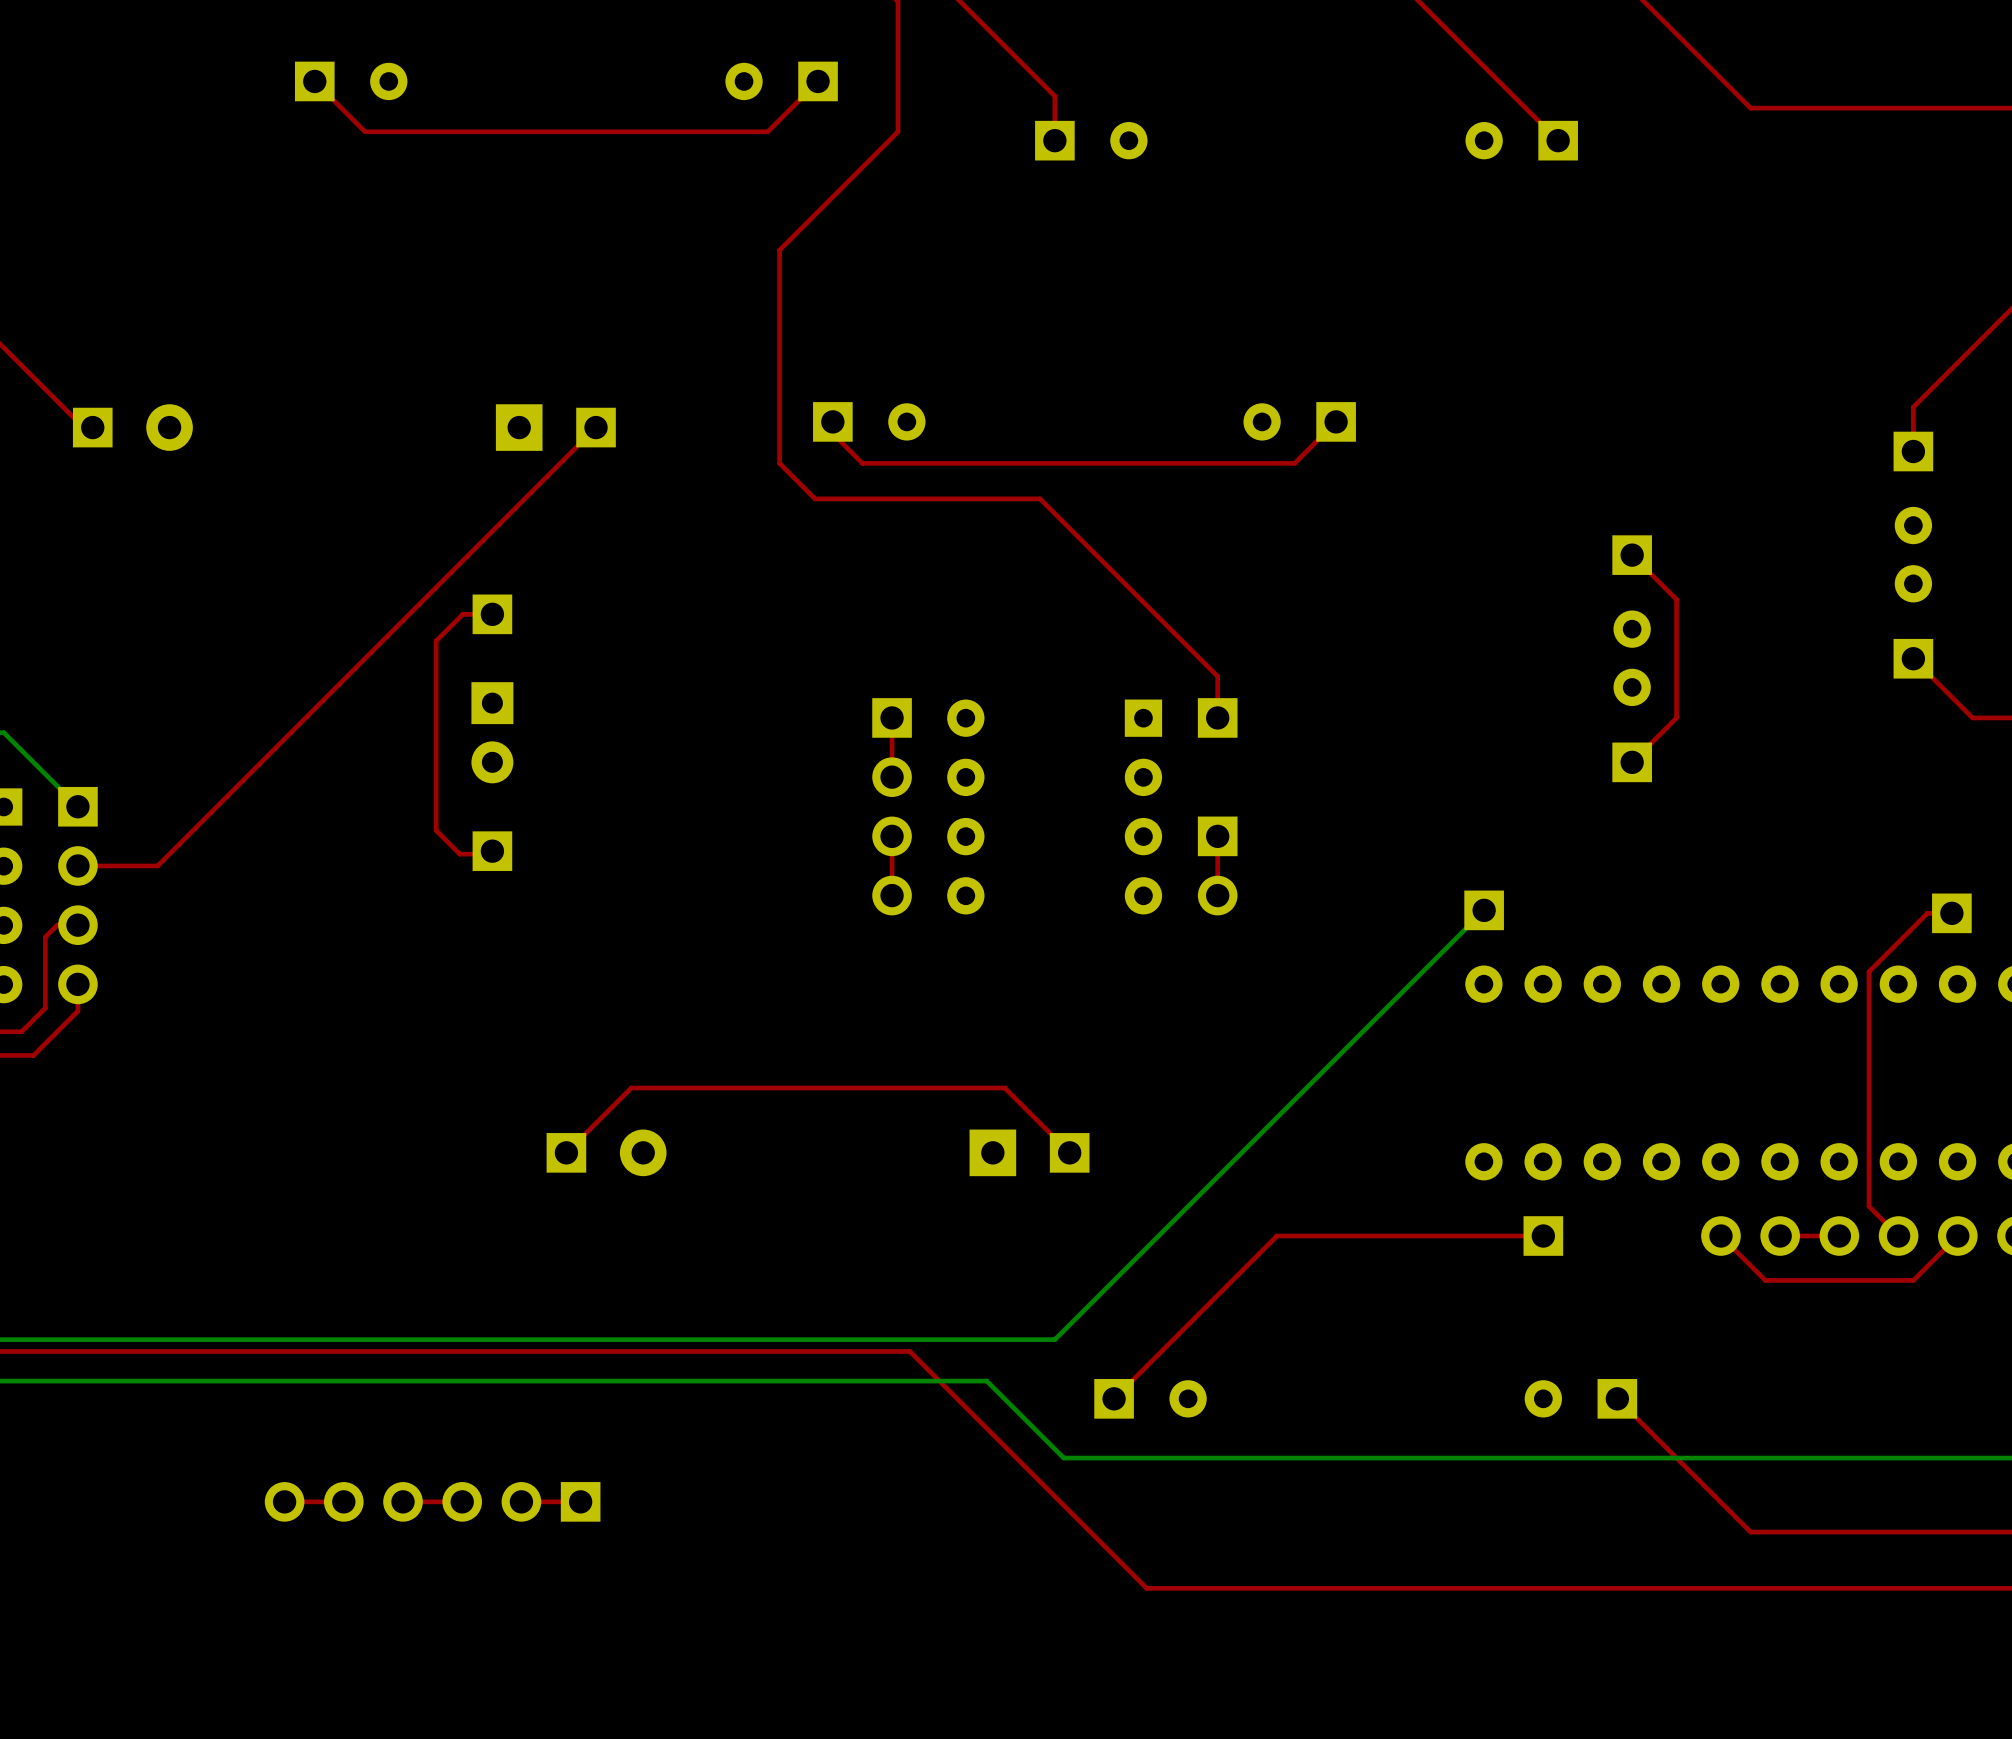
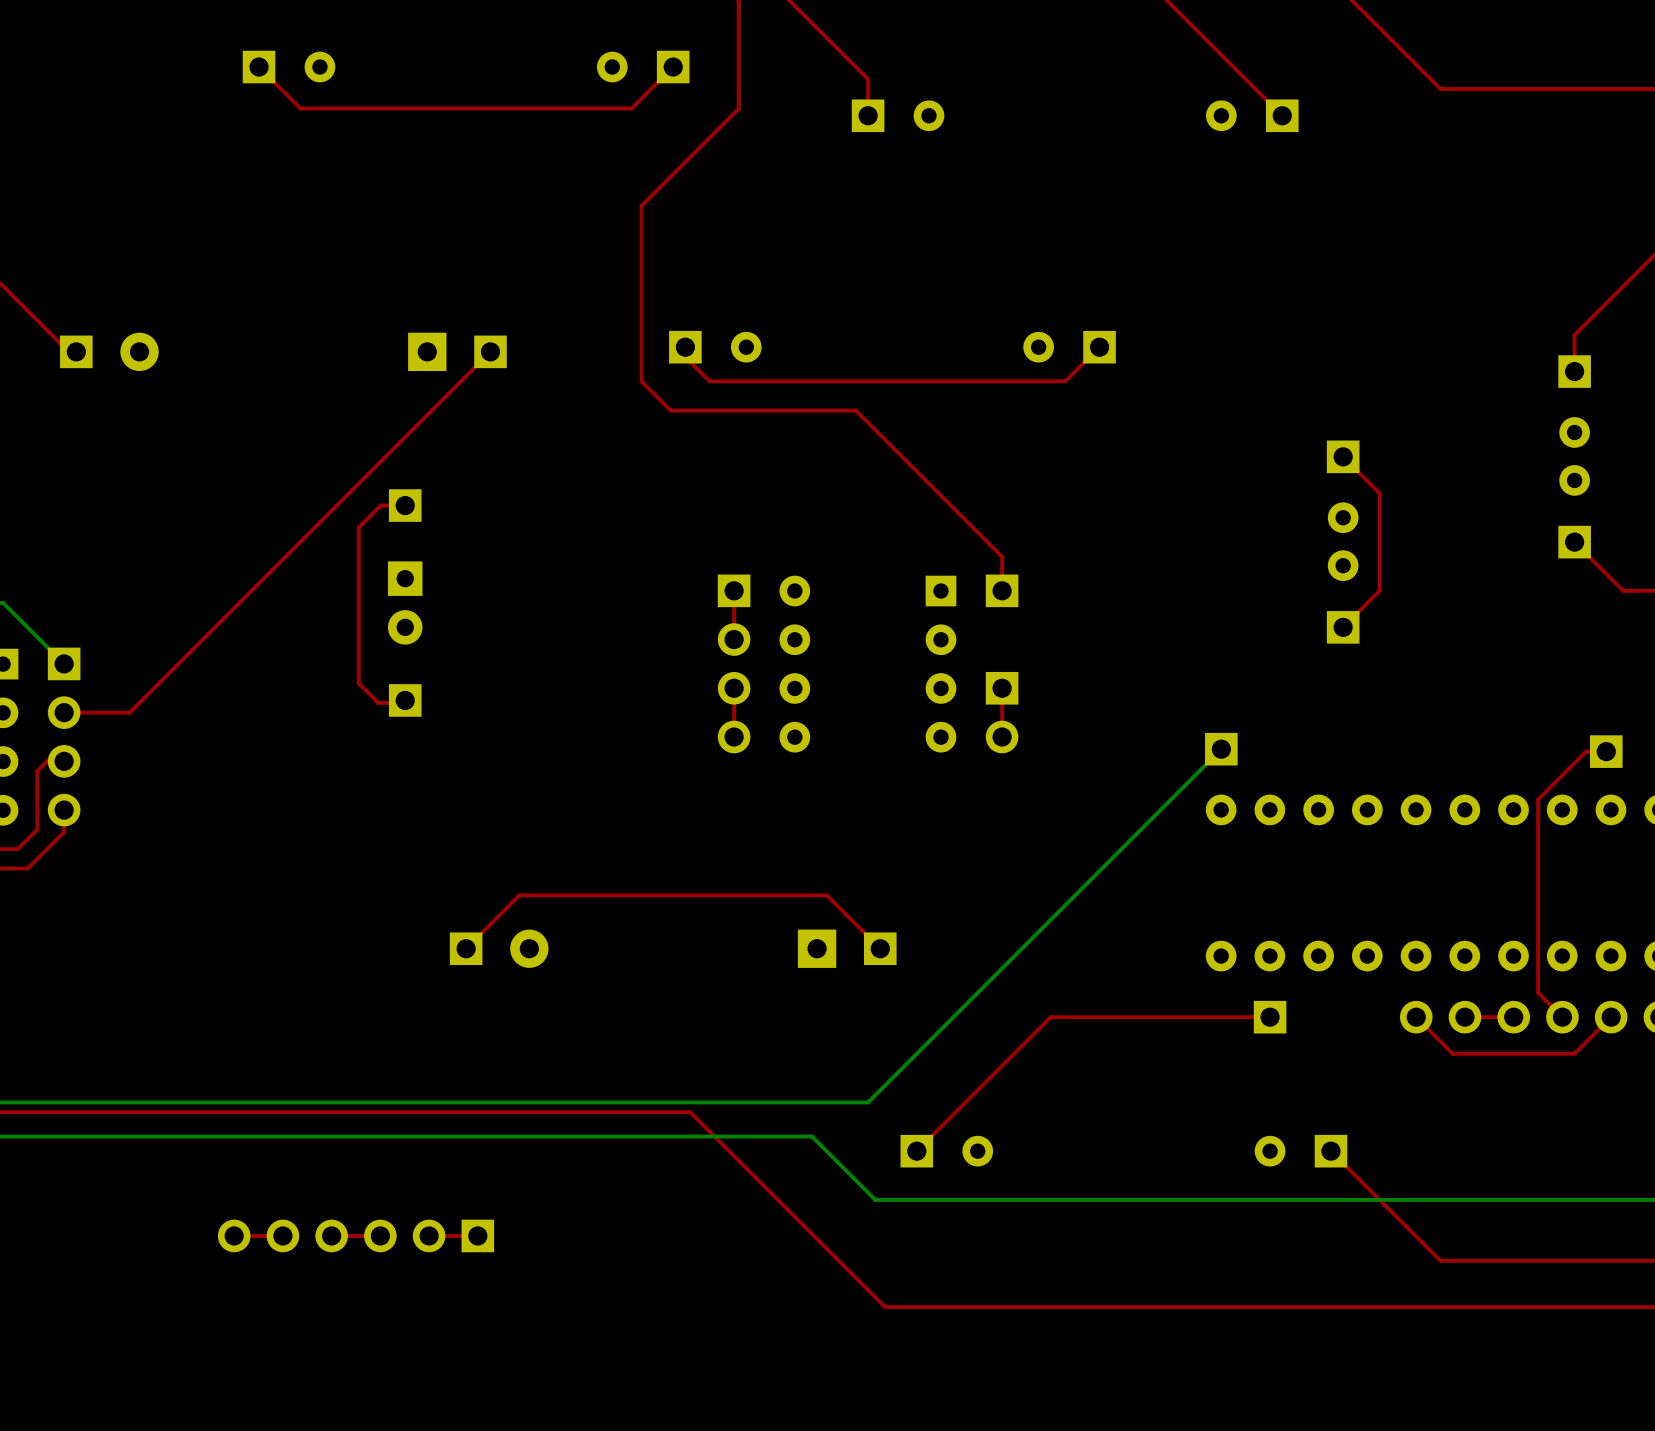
top track: (838, 1351) (909, 1351) (1146, 1588) -> (690, 1112) (885, 1307) (943, 1307)

